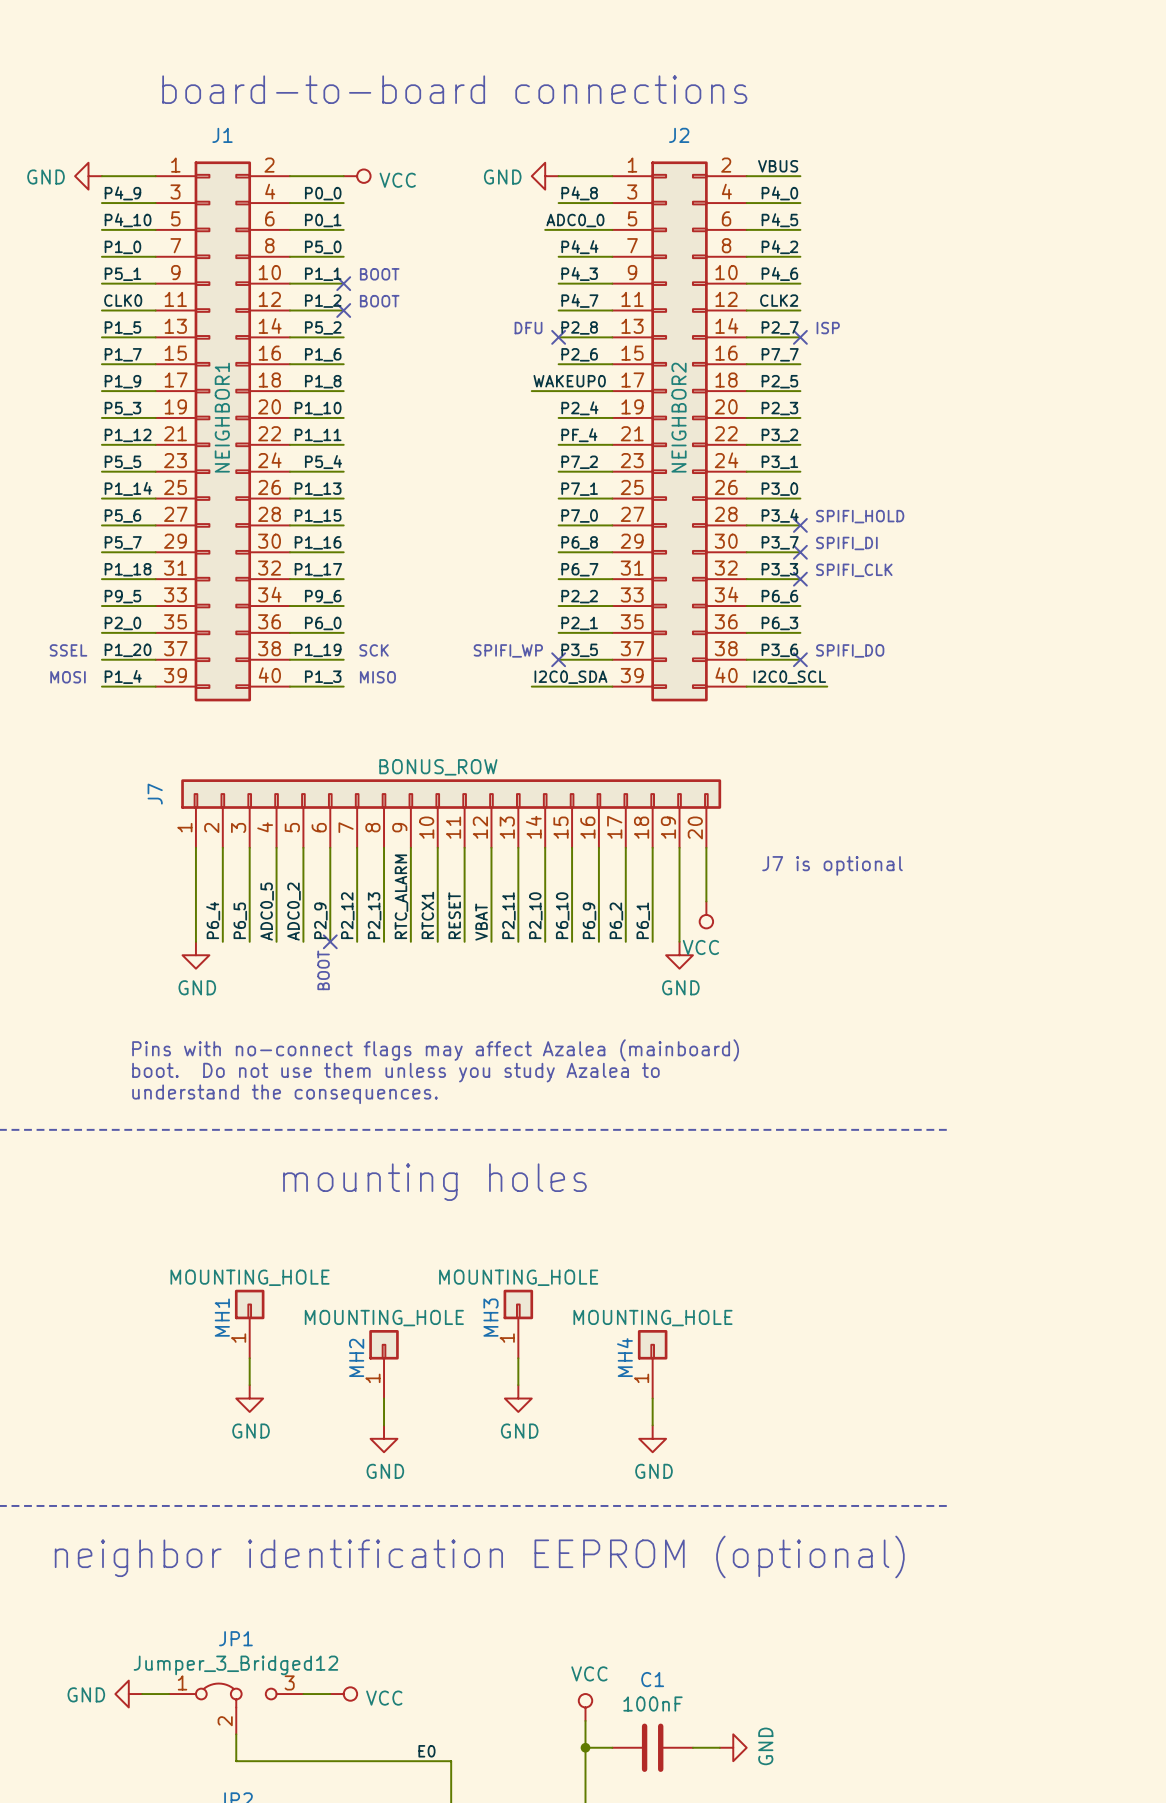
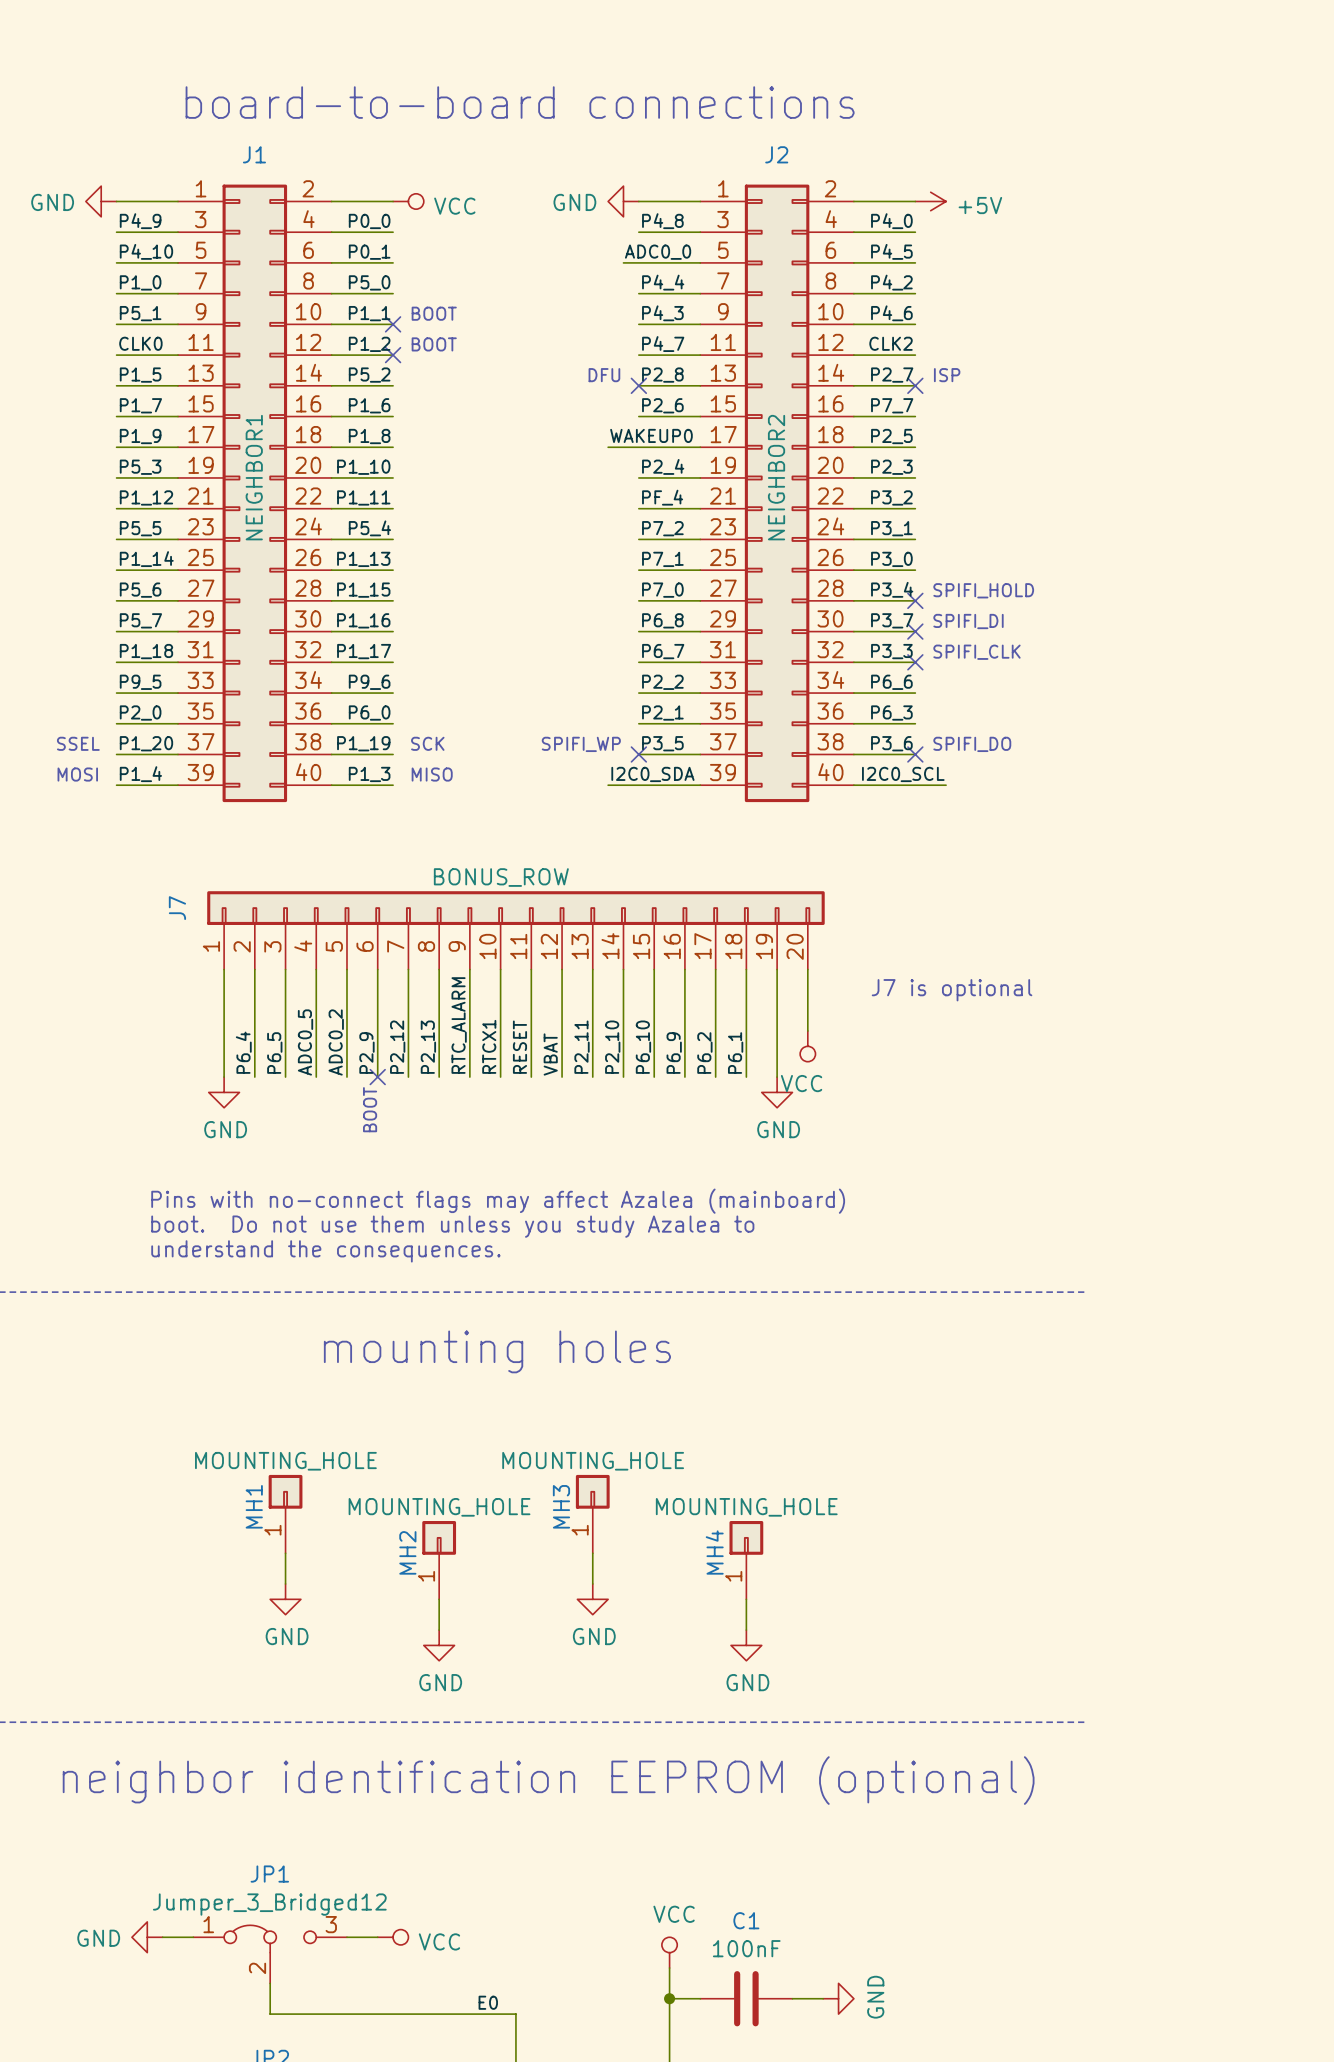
label: VBUS (778, 166) -> none
power symbol: none -> +5V (930, 201)

